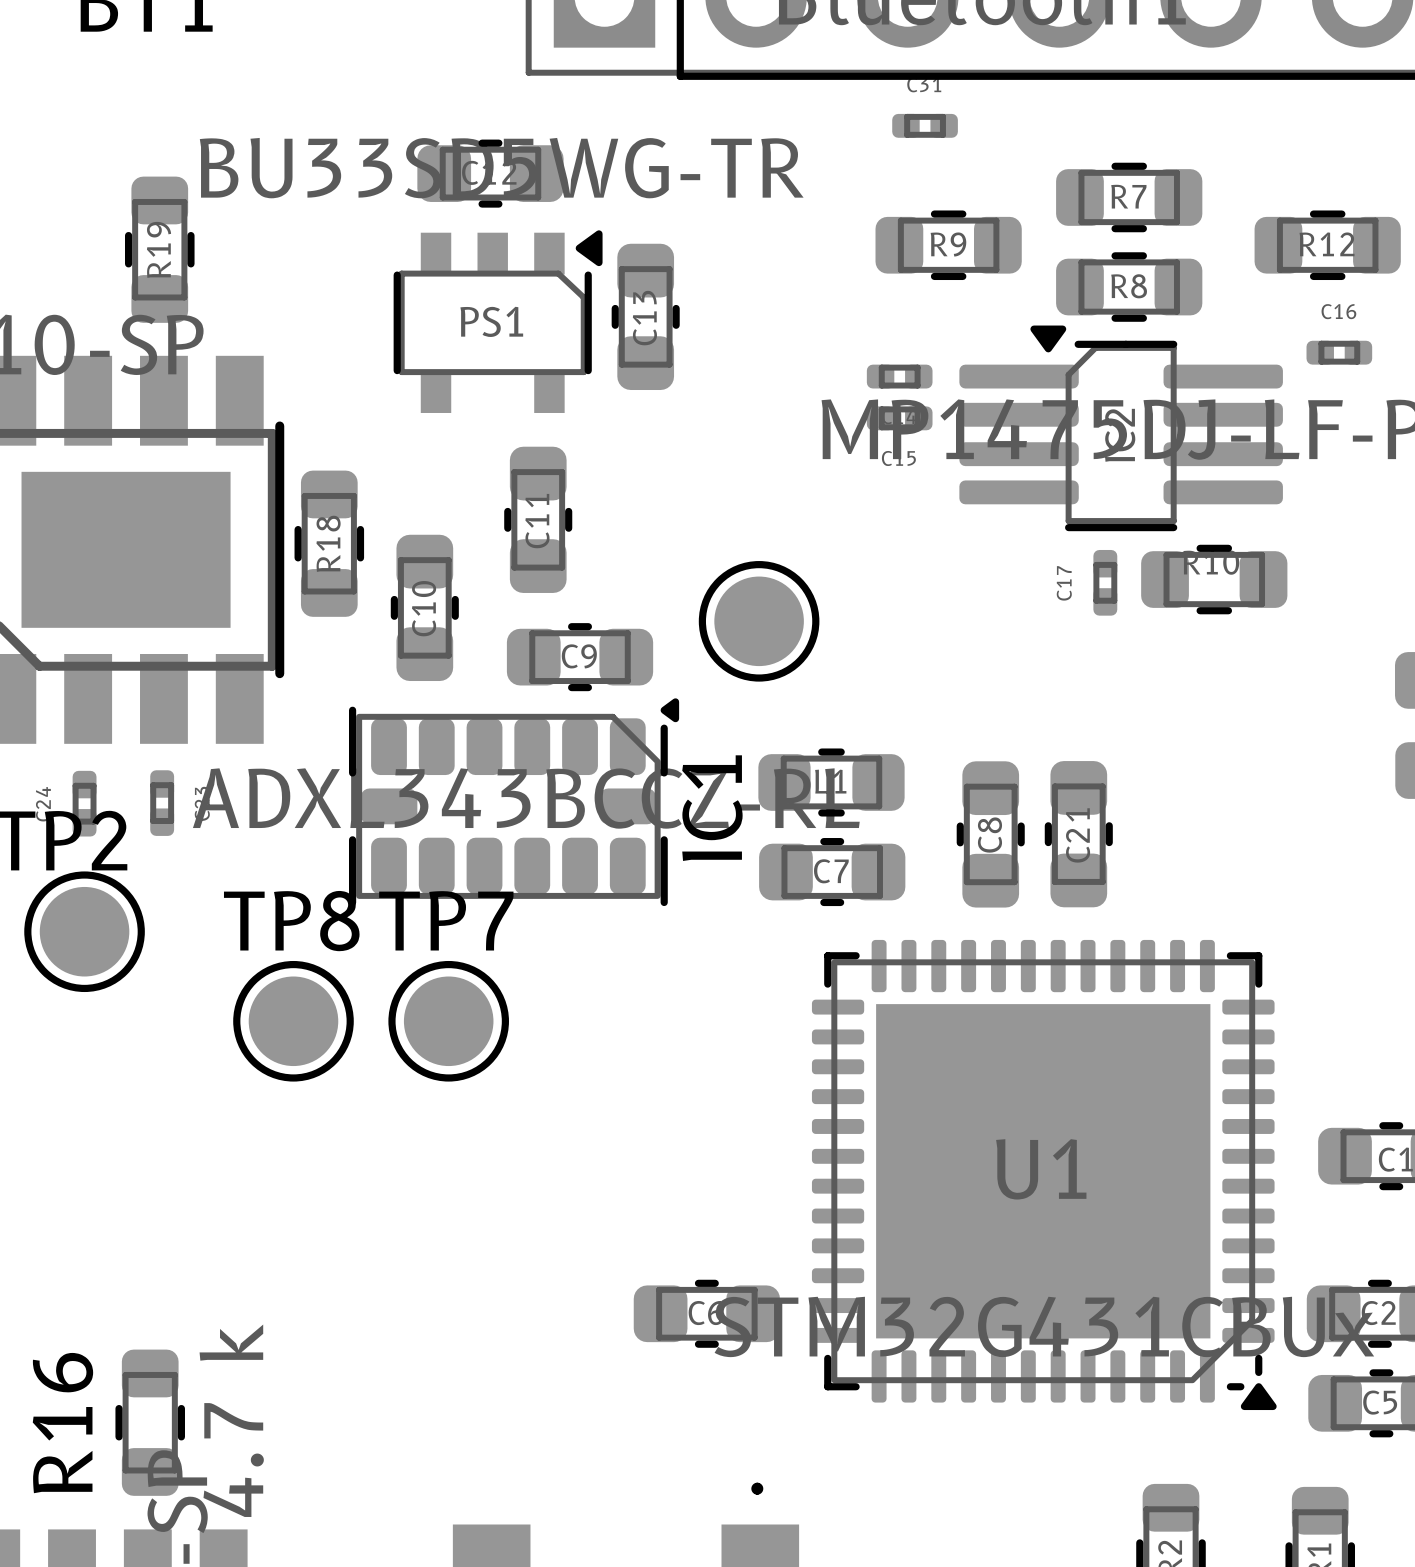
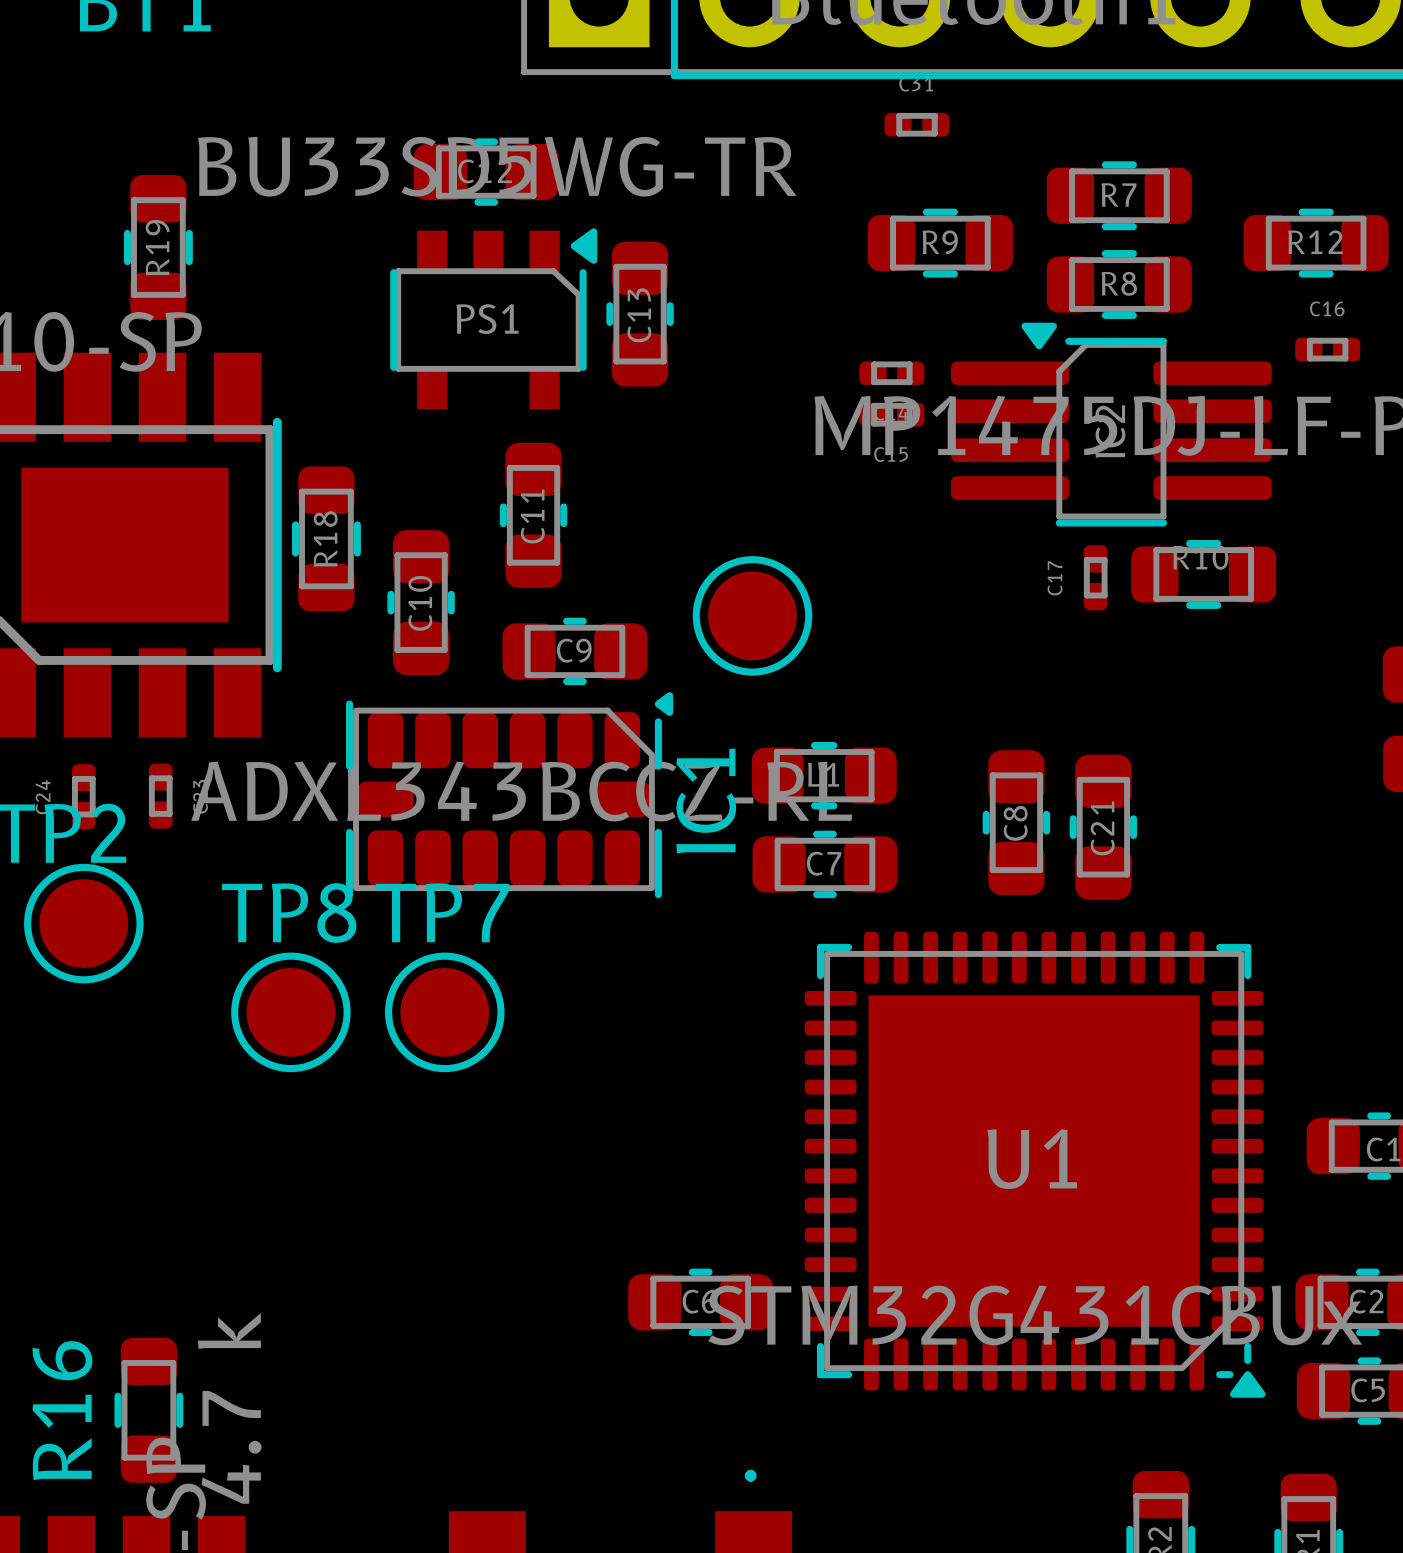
C8 position: (990, 834) -> (1016, 822)
C21 position: (1078, 834) -> (1103, 827)

